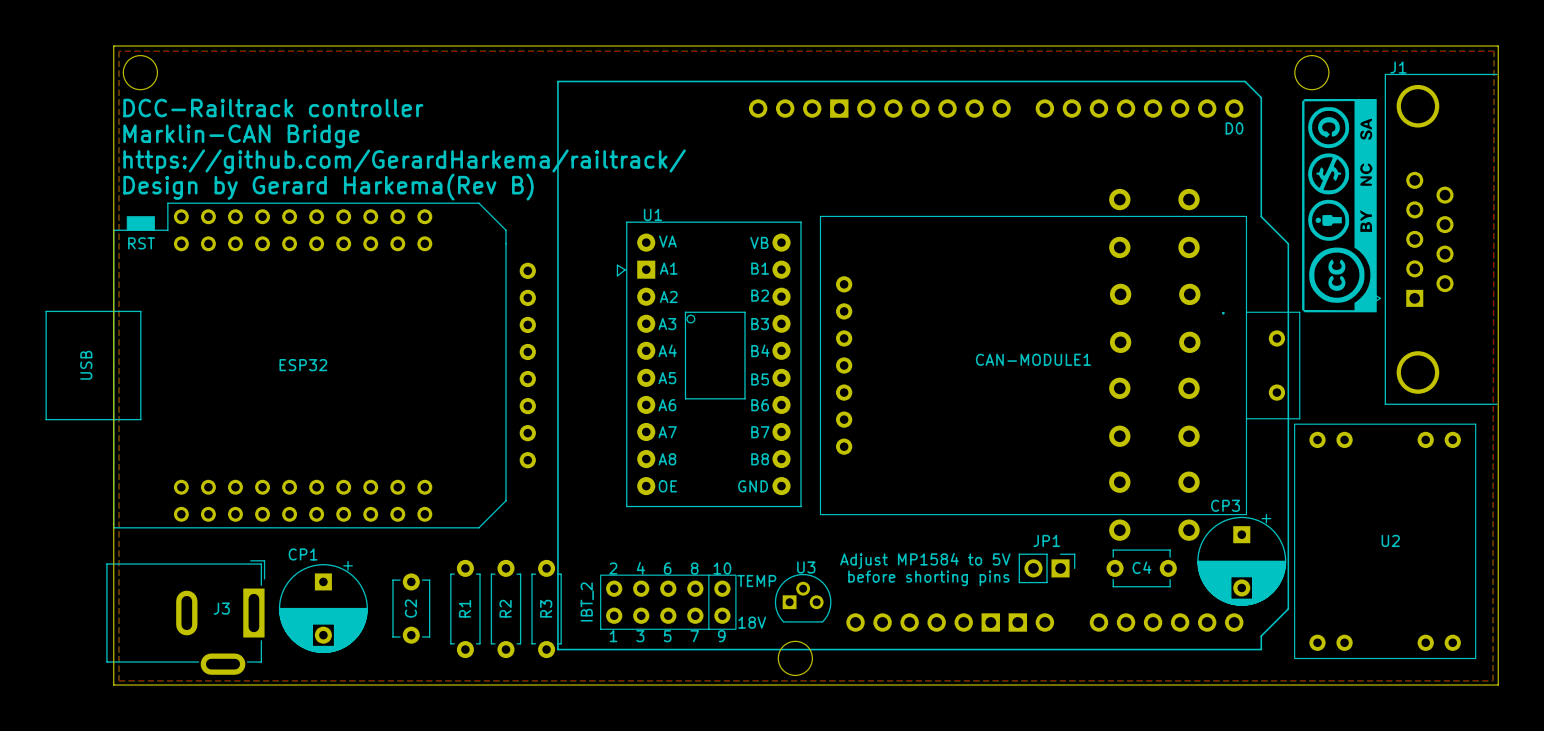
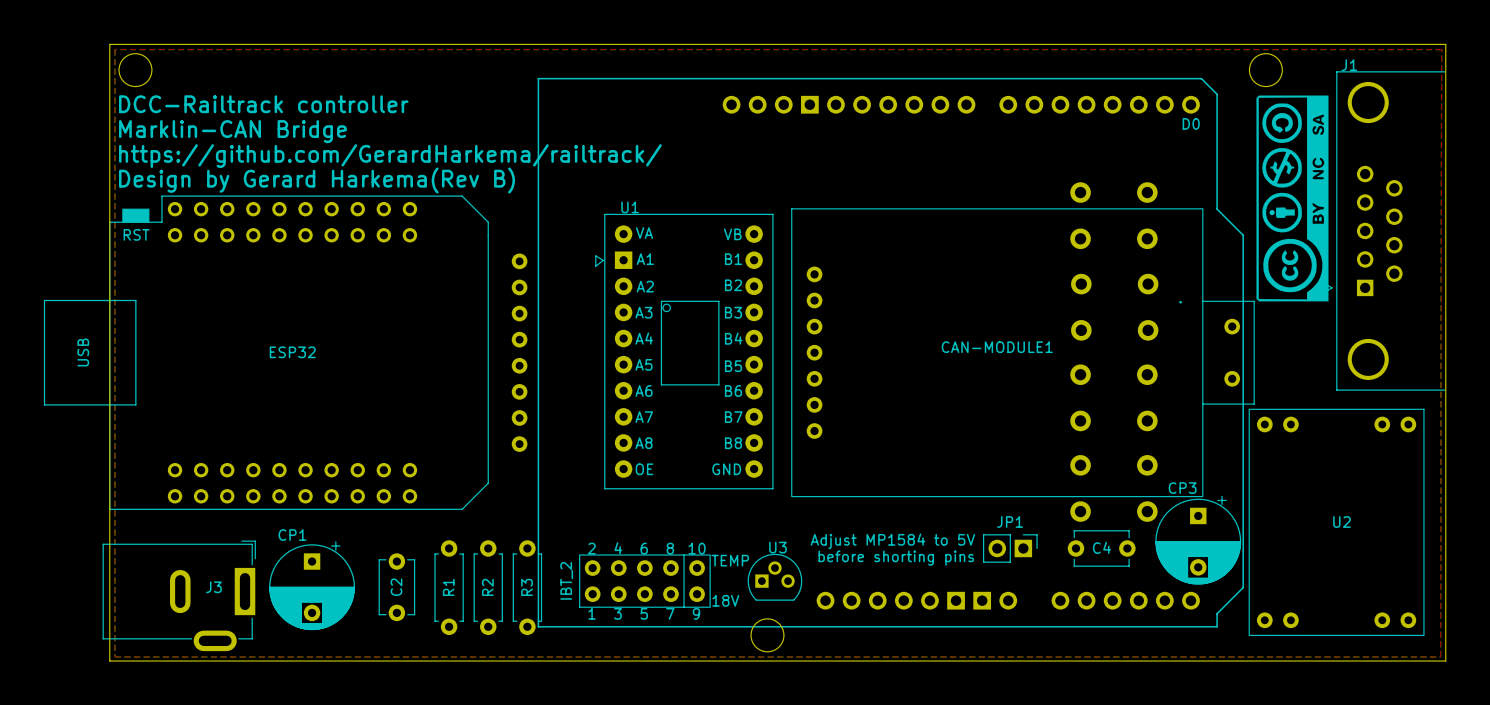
part footprint: [519, 262, 536, 469] -> [511, 253, 528, 452]
U2 footprint: [1294, 423, 1477, 660] -> [1248, 408, 1425, 636]

